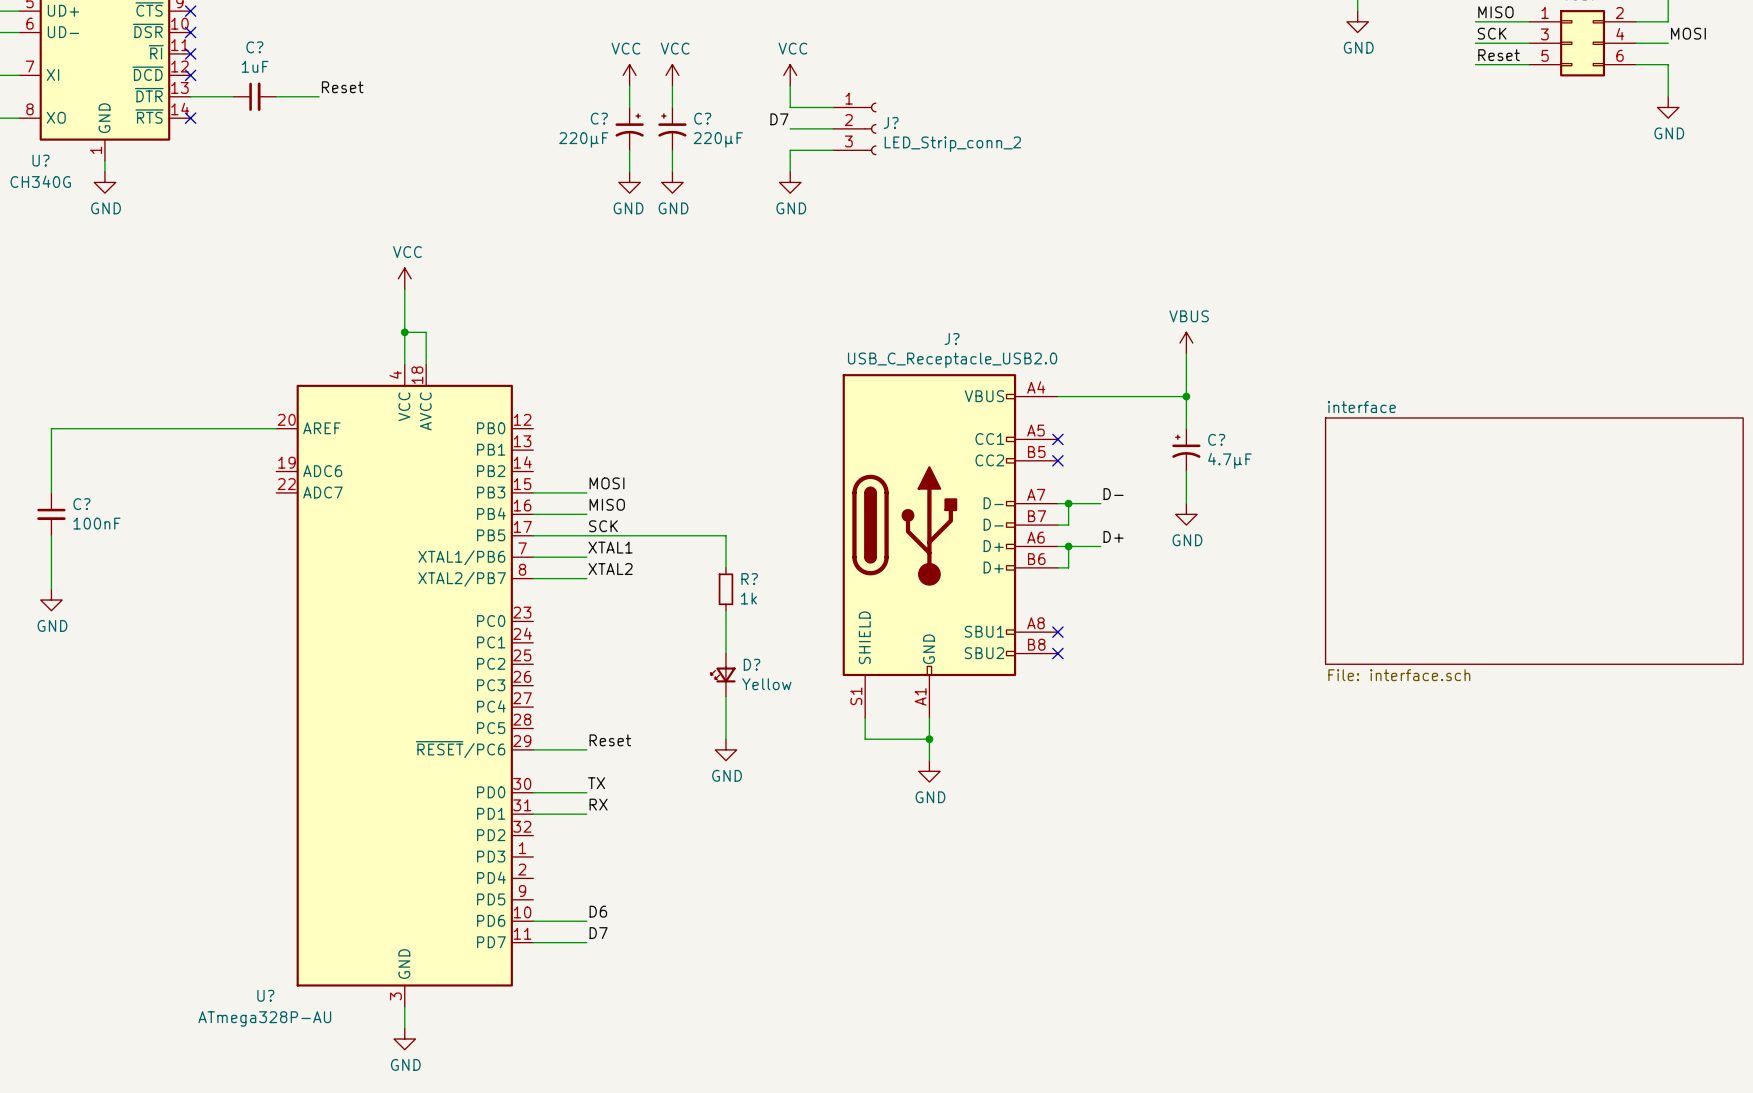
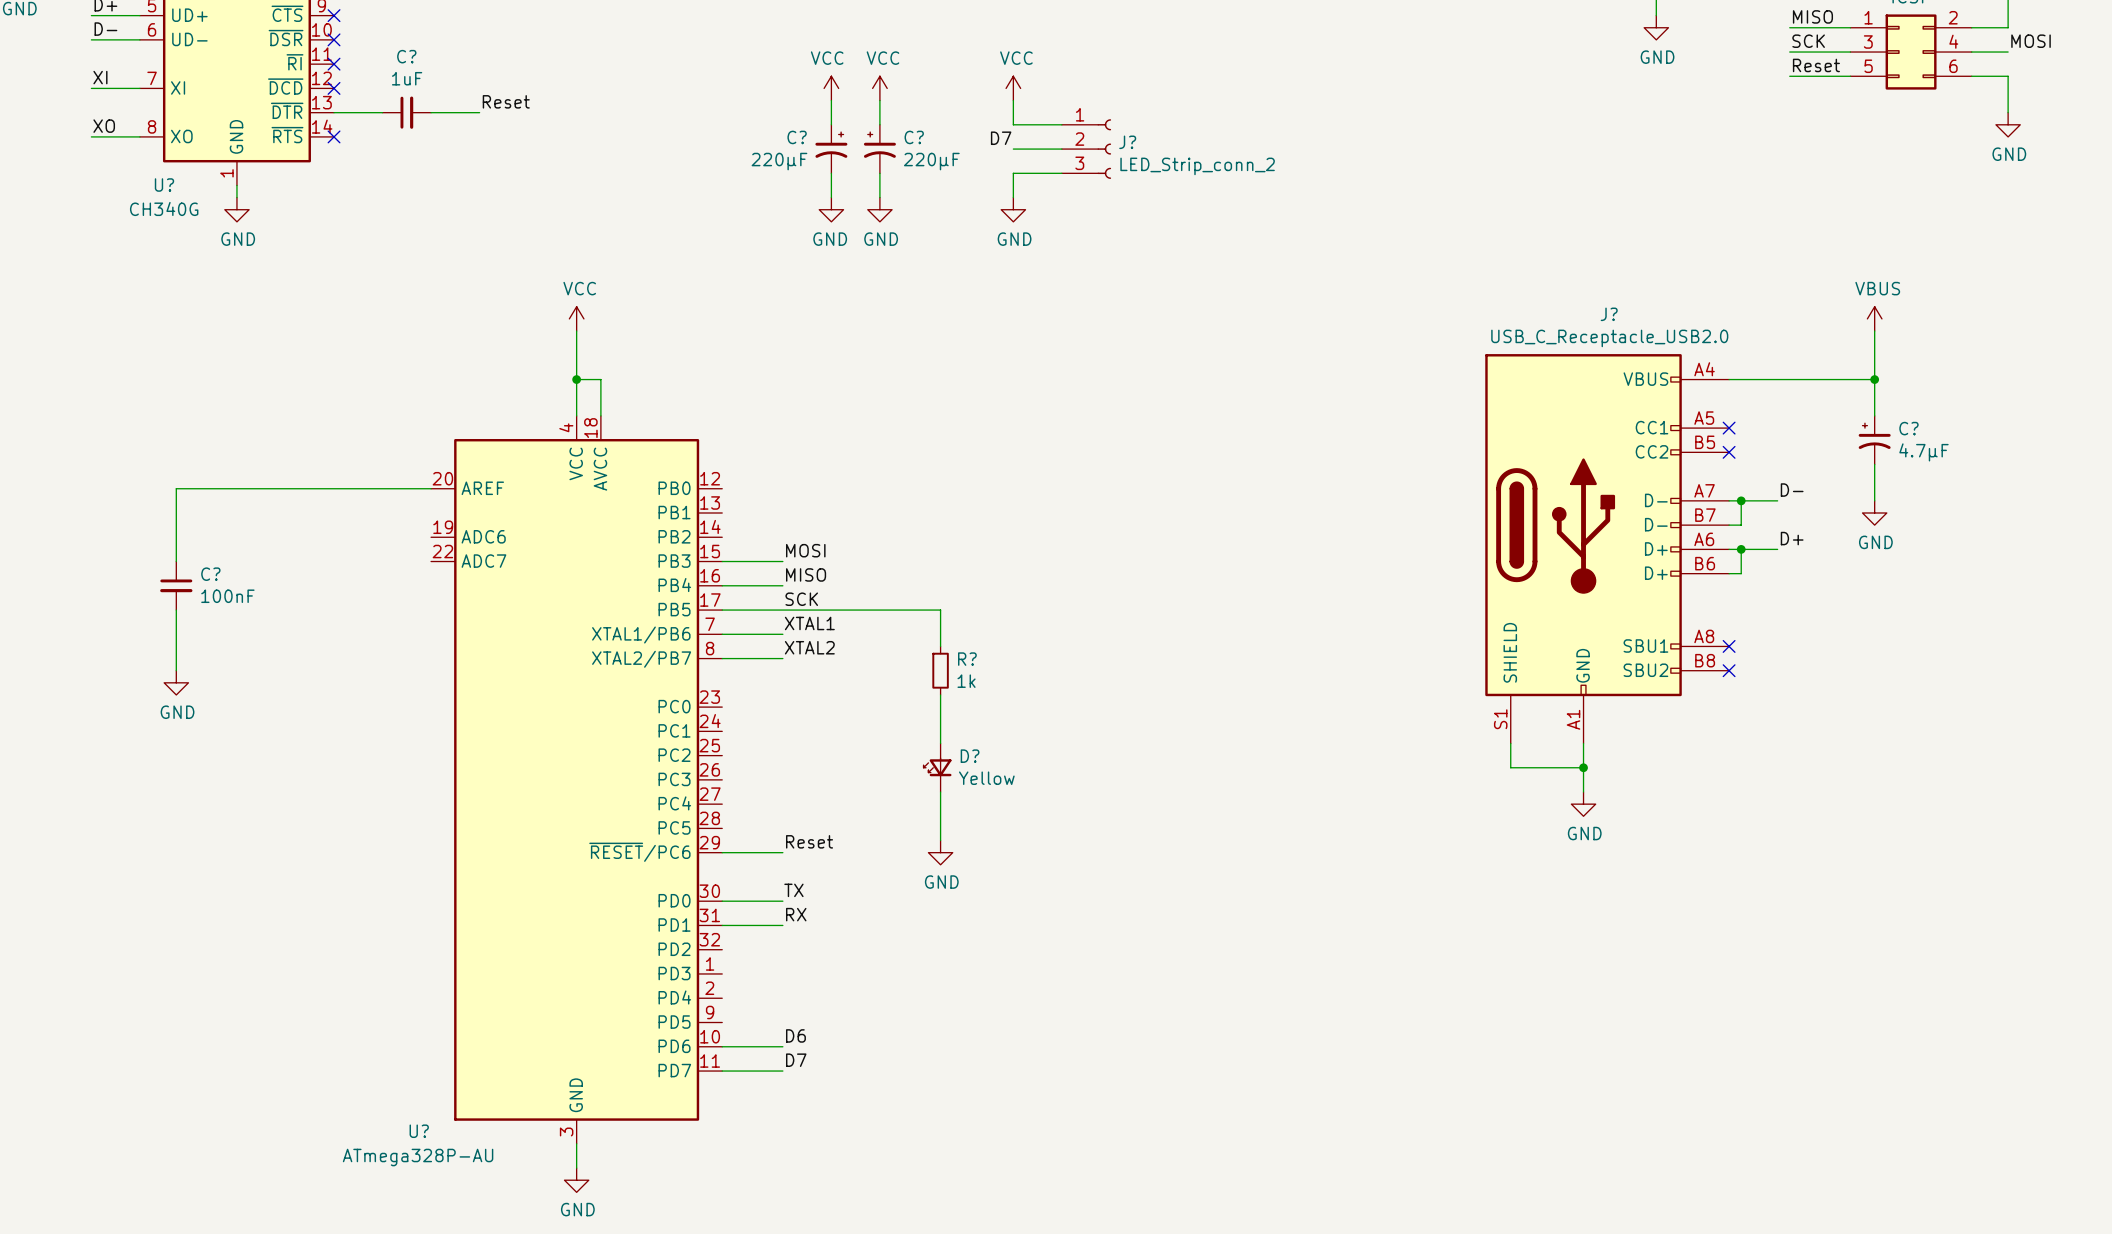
power symbol: none -> VBUS (1874, 318)
wire: none -> (1874, 331) (1874, 415)
wire: none -> (1729, 379) (1874, 379)
junction: none -> (1874, 379)
power symbol: VBUS (1186, 343) -> none
wire: (1186, 353) (1186, 428) -> none
no-connect mark: none -> (1729, 428)
C?: none -> 4.7μF (1874, 440)
wire: (1057, 396) (1186, 396) -> none
junction: (1186, 396) -> none
no-connect mark: none -> (1729, 452)
wire: none -> (1874, 464) (1874, 500)
label: none -> D- (1792, 490)
no-connect mark: (1057, 439) -> none
wire: none -> (1729, 500) (1777, 500)
wire: none -> (1741, 500) (1741, 525) (1729, 525)
junction: none -> (1741, 500)
C?: 4.7μF (1186, 450) -> none
power symbol: none -> GND (1874, 512)
no-connect mark: (1057, 460) -> none
wire: (1186, 471) (1186, 503) -> none
label: none -> D+ (1792, 538)
J?: none -> USB_C_Receptacle_USB2.0 (1607, 548)
wire: none -> (1729, 549) (1777, 549)
wire: none -> (1741, 549) (1741, 573) (1729, 573)
junction: none -> (1741, 549)
label: D- (1113, 494) -> none
wire: (1057, 503) (1100, 503) -> none
wire: (1068, 503) (1068, 525) (1057, 525) -> none
junction: (1068, 503) -> none
power symbol: GND (1186, 514) -> none
label: D+ (1113, 536) -> none
sheet interface: File: interface.sch (1534, 541) -> none
J?: USB_C_Receptacle_USB2.0 (950, 545) -> none
wire: (1057, 546) (1100, 546) -> none
wire: (1068, 546) (1068, 567) (1057, 567) -> none
junction: (1068, 546) -> none
no-connect mark: none -> (1729, 646)
no-connect mark: none -> (1729, 670)
no-connect mark: (1057, 632) -> none
no-connect mark: (1057, 653) -> none
wire: none -> (1510, 743) (1510, 767) (1583, 767)
wire: none -> (1583, 743) (1583, 792)
junction: none -> (1583, 767)
power symbol: none -> GND (1583, 804)
wire: (865, 717) (865, 739) (929, 739) -> none
wire: (929, 717) (929, 760) -> none
junction: (929, 739) -> none
power symbol: GND (929, 771) -> none

